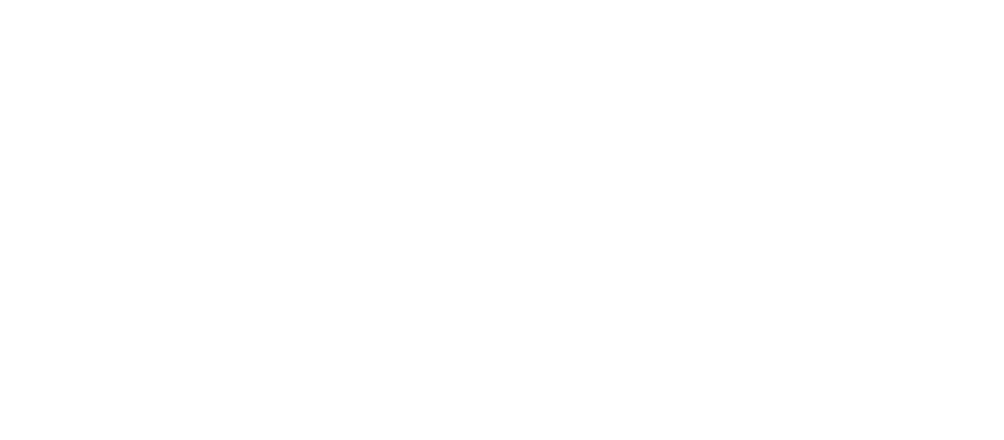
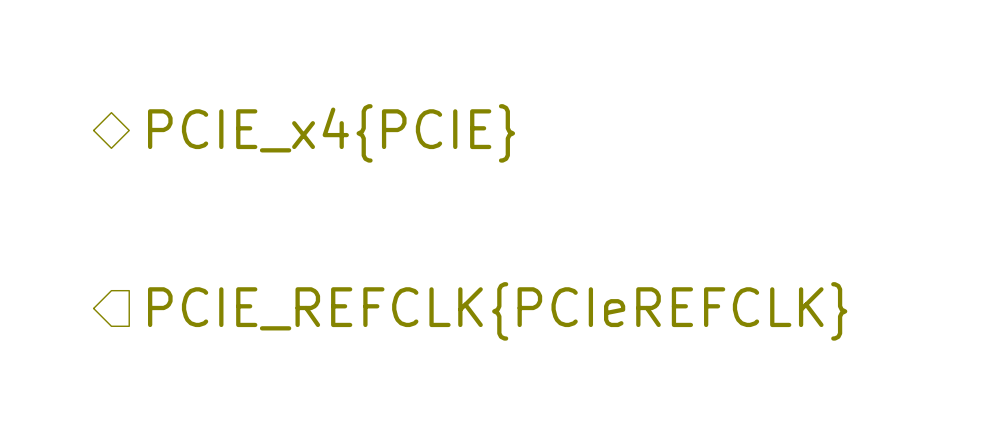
hierarchical label: none -> PCIE_x4{PCIE} (331, 133)
hierarchical label: none -> PCIE_REFCLK{PCIeREFCLK} (497, 311)

